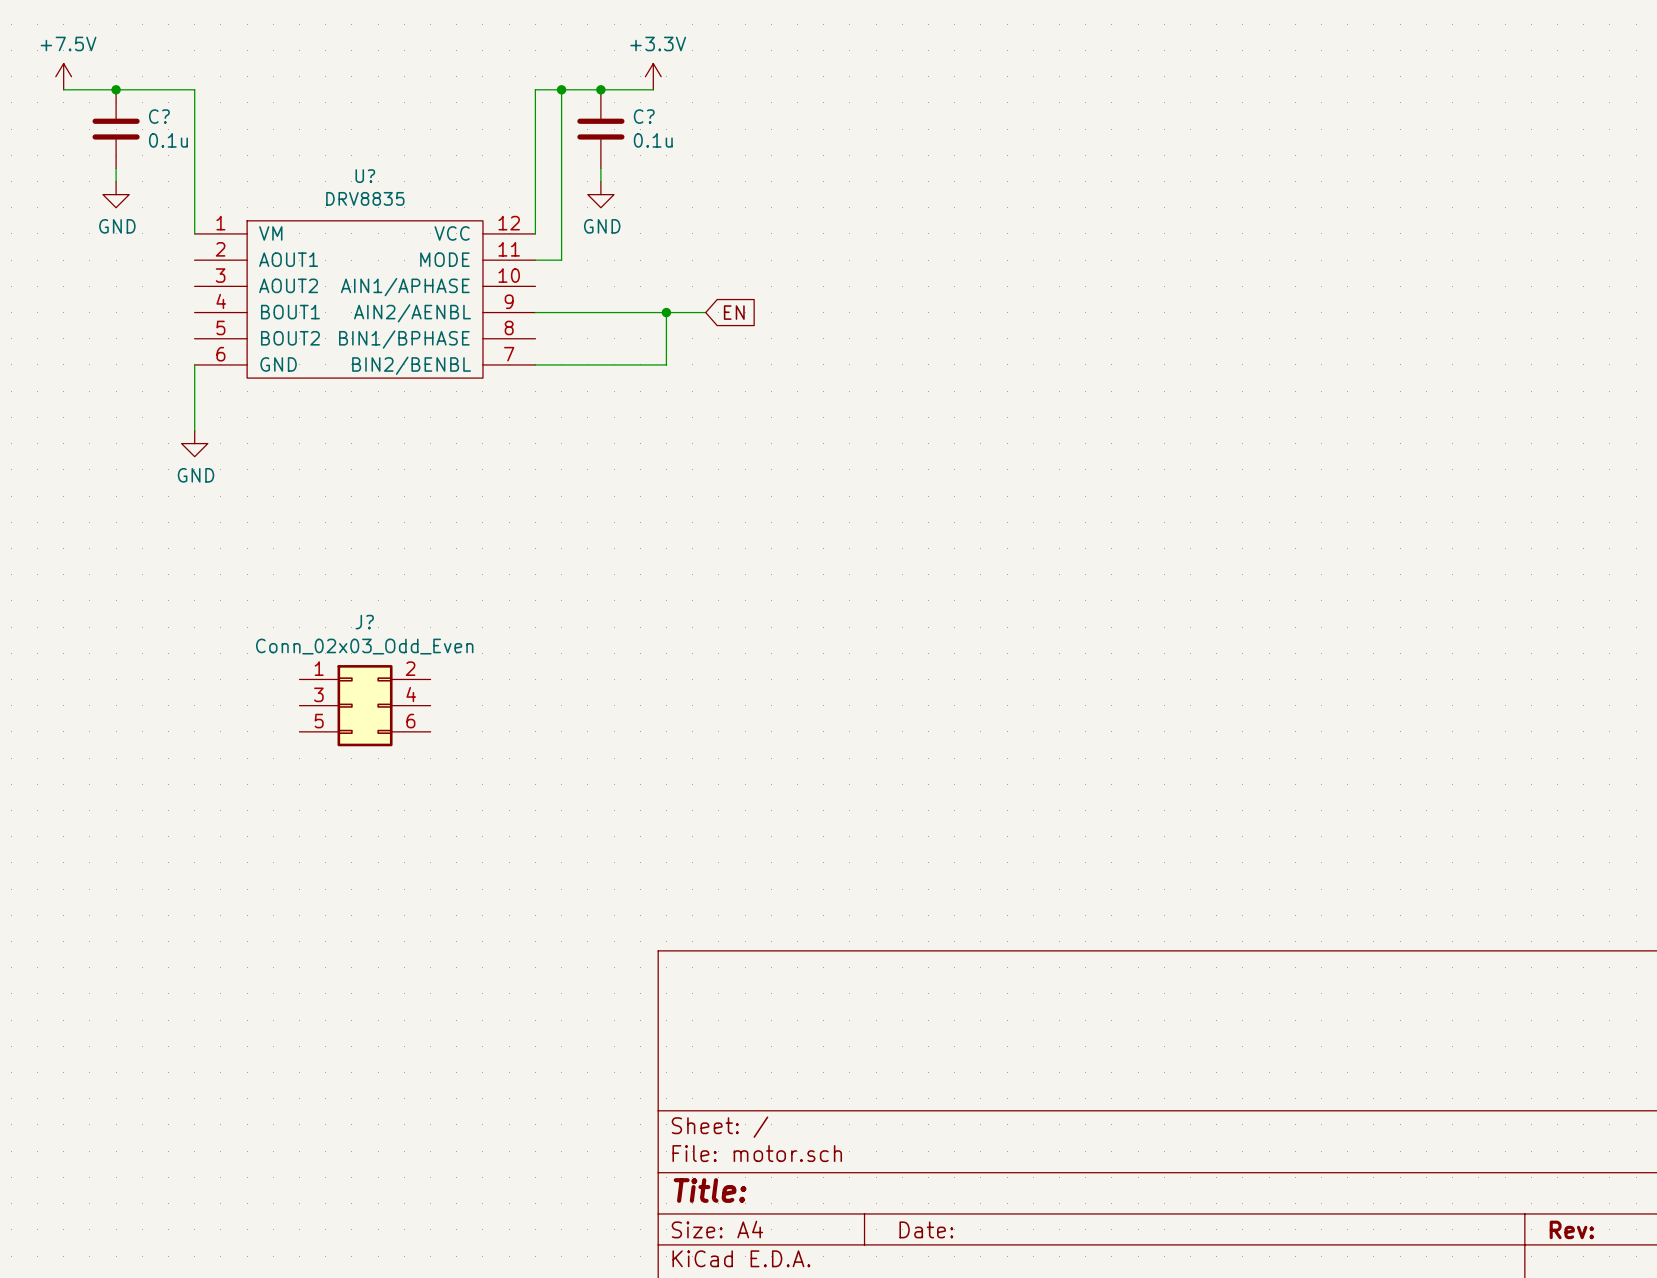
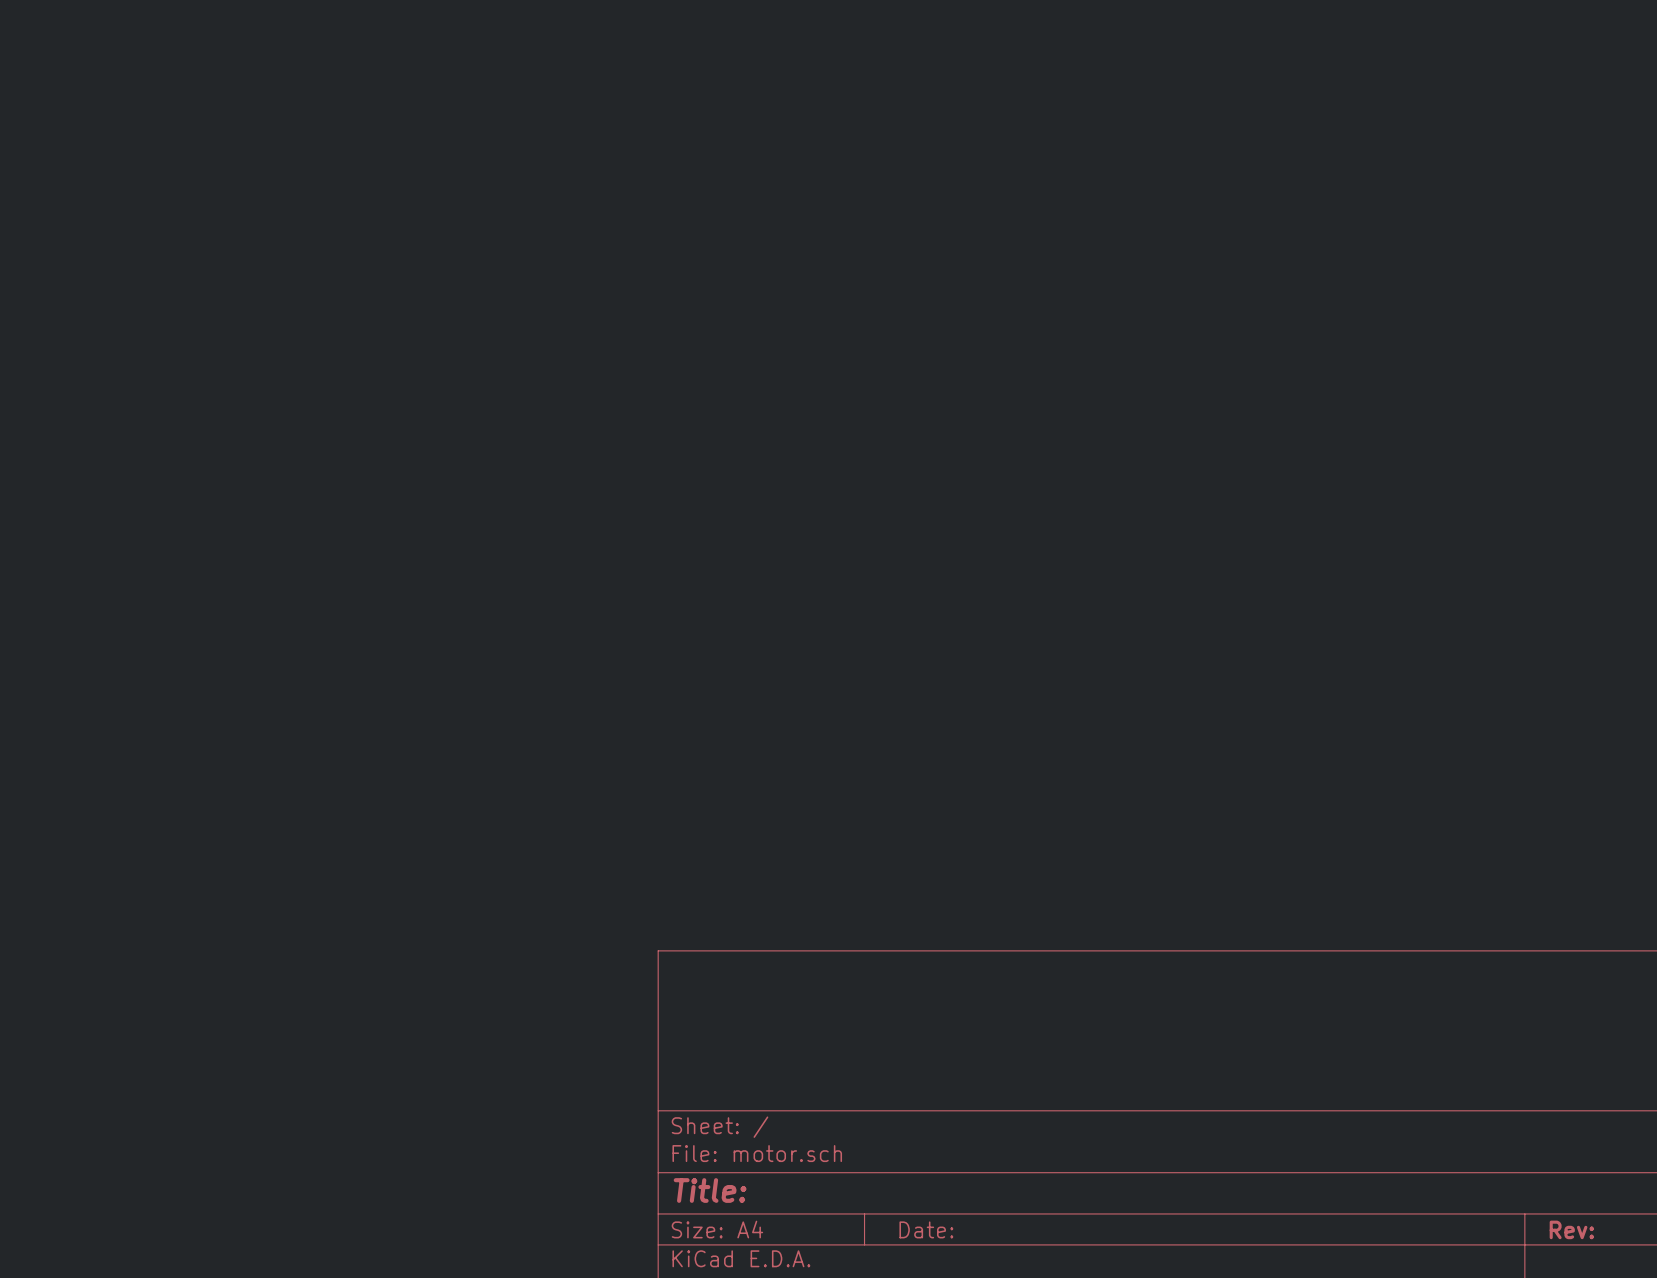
power symbol: +7.5V (63, 76) -> none
power symbol: +3.3V (653, 76) -> none
wire: (63, 89) (194, 89) (194, 233) -> none
junction: (116, 89) -> none
wire: (561, 89) (561, 260) (535, 260) -> none
junction: (561, 89) -> none
junction: (600, 89) -> none
wire: (653, 89) (535, 89) (535, 233) -> none
C?: 0.1u (116, 129) -> none
C?: 0.1u (600, 129) -> none
wire: (116, 168) (116, 181) -> none
wire: (600, 168) (600, 181) -> none
power symbol: GND (116, 194) -> none
power symbol: GND (600, 194) -> none
U?: DRV8835 (365, 299) -> none
wire: (535, 312) (705, 312) -> none
wire: (666, 312) (666, 364) (535, 364) -> none
junction: (666, 312) -> none
global label: EN (734, 312) -> none
wire: (194, 364) (194, 430) -> none
power symbol: GND (194, 443) -> none
J?: Conn_02x03_Odd_Even (365, 705) -> none

